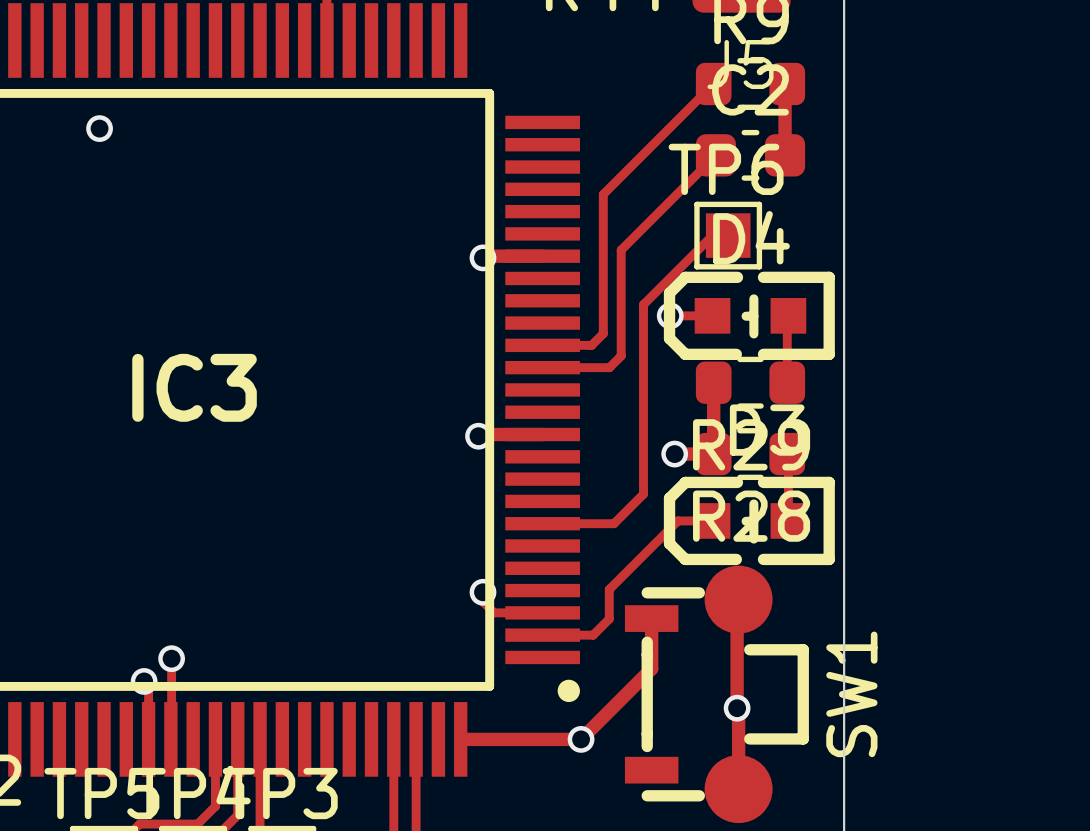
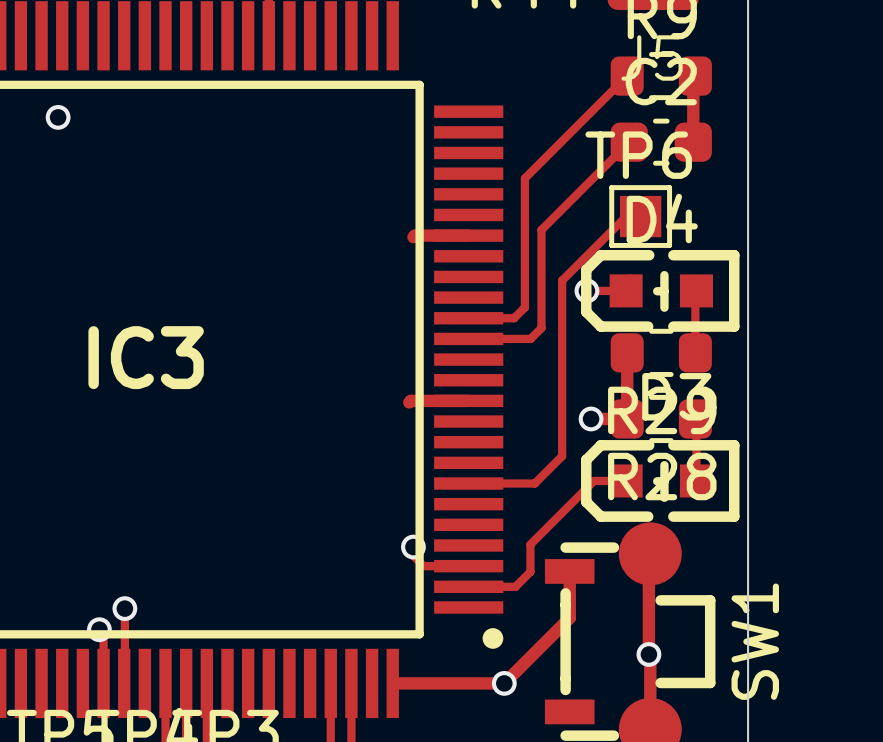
via: (482, 257) -> none
via: (478, 436) -> none

